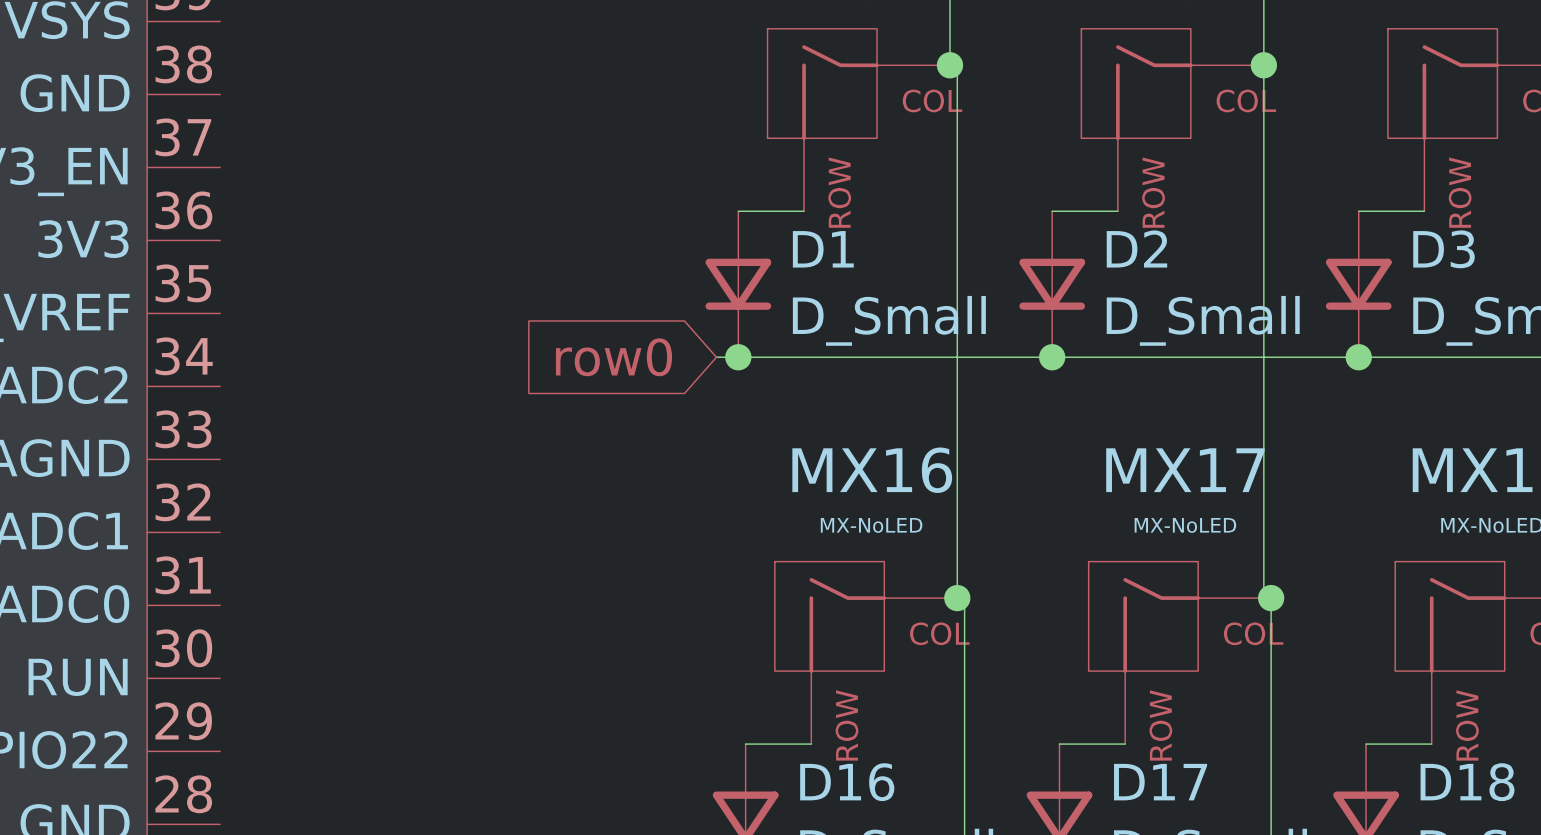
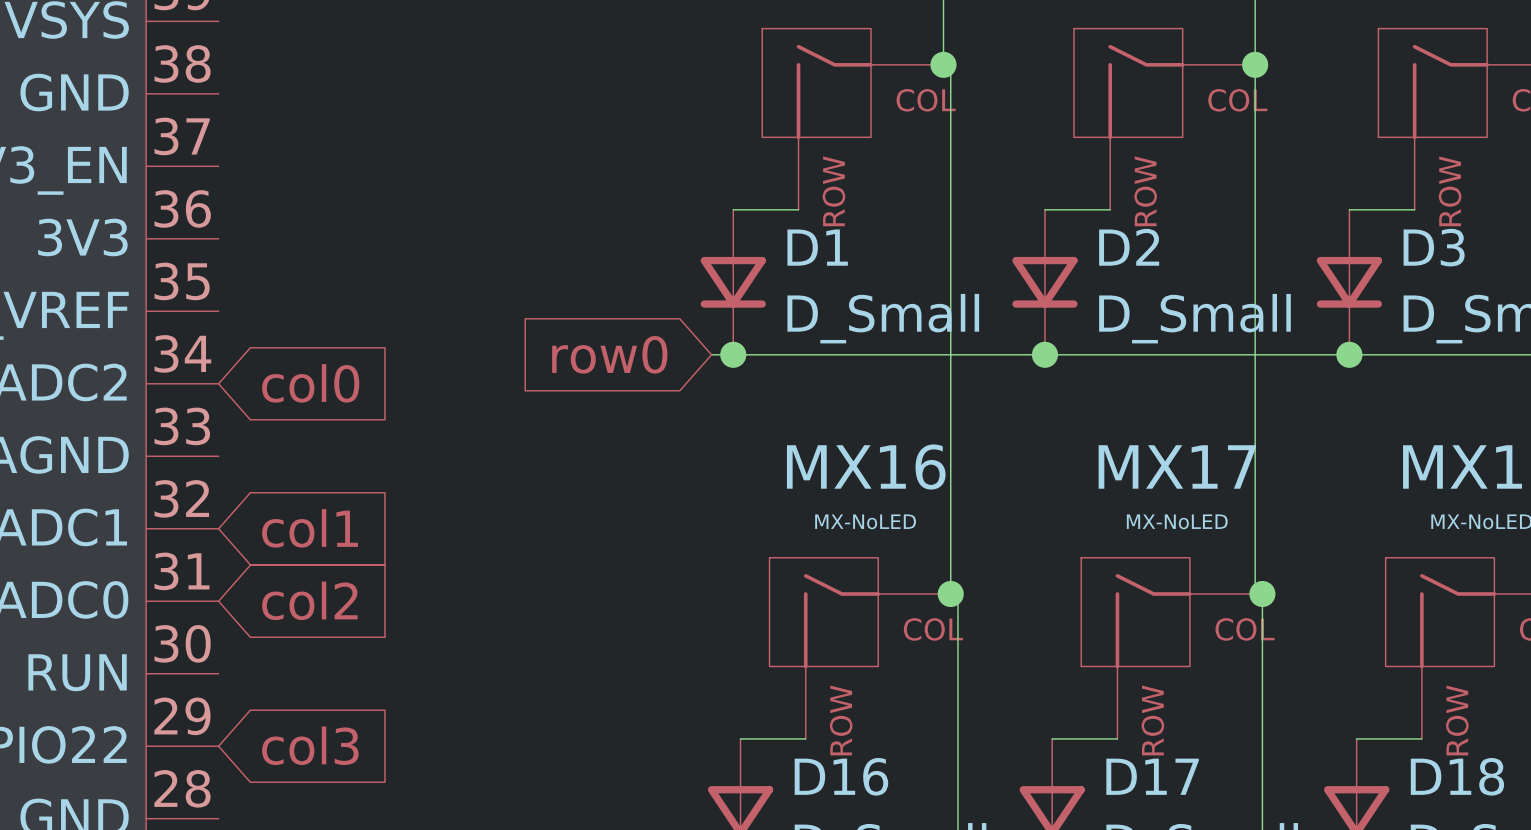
global label: none -> col0 (310, 383)
global label: none -> col1 (310, 528)
global label: none -> col2 (309, 600)
global label: none -> col3 (310, 745)

